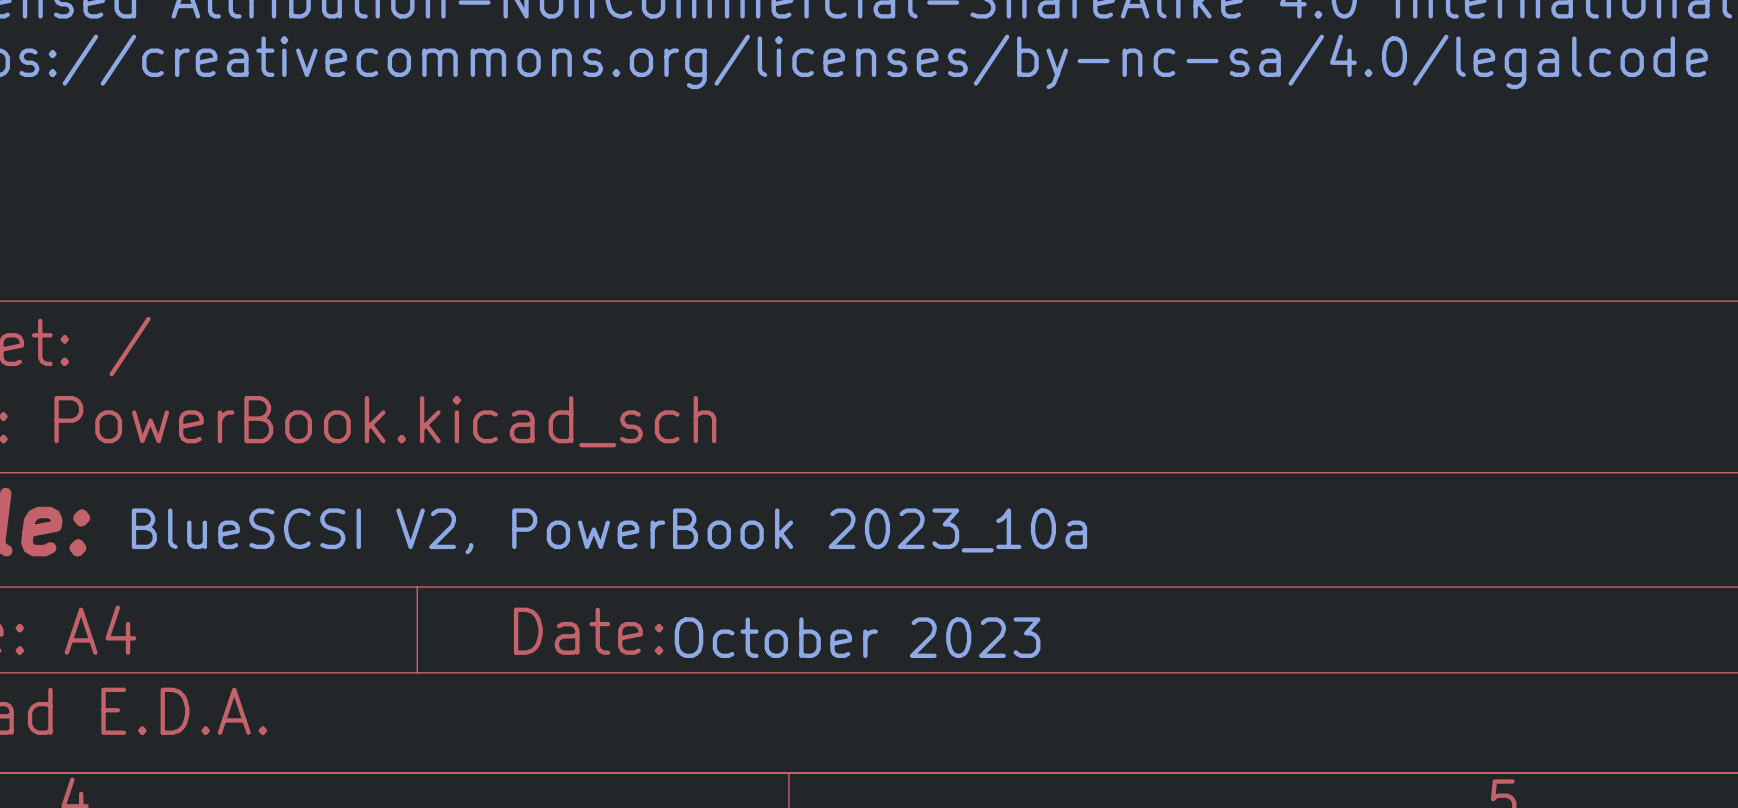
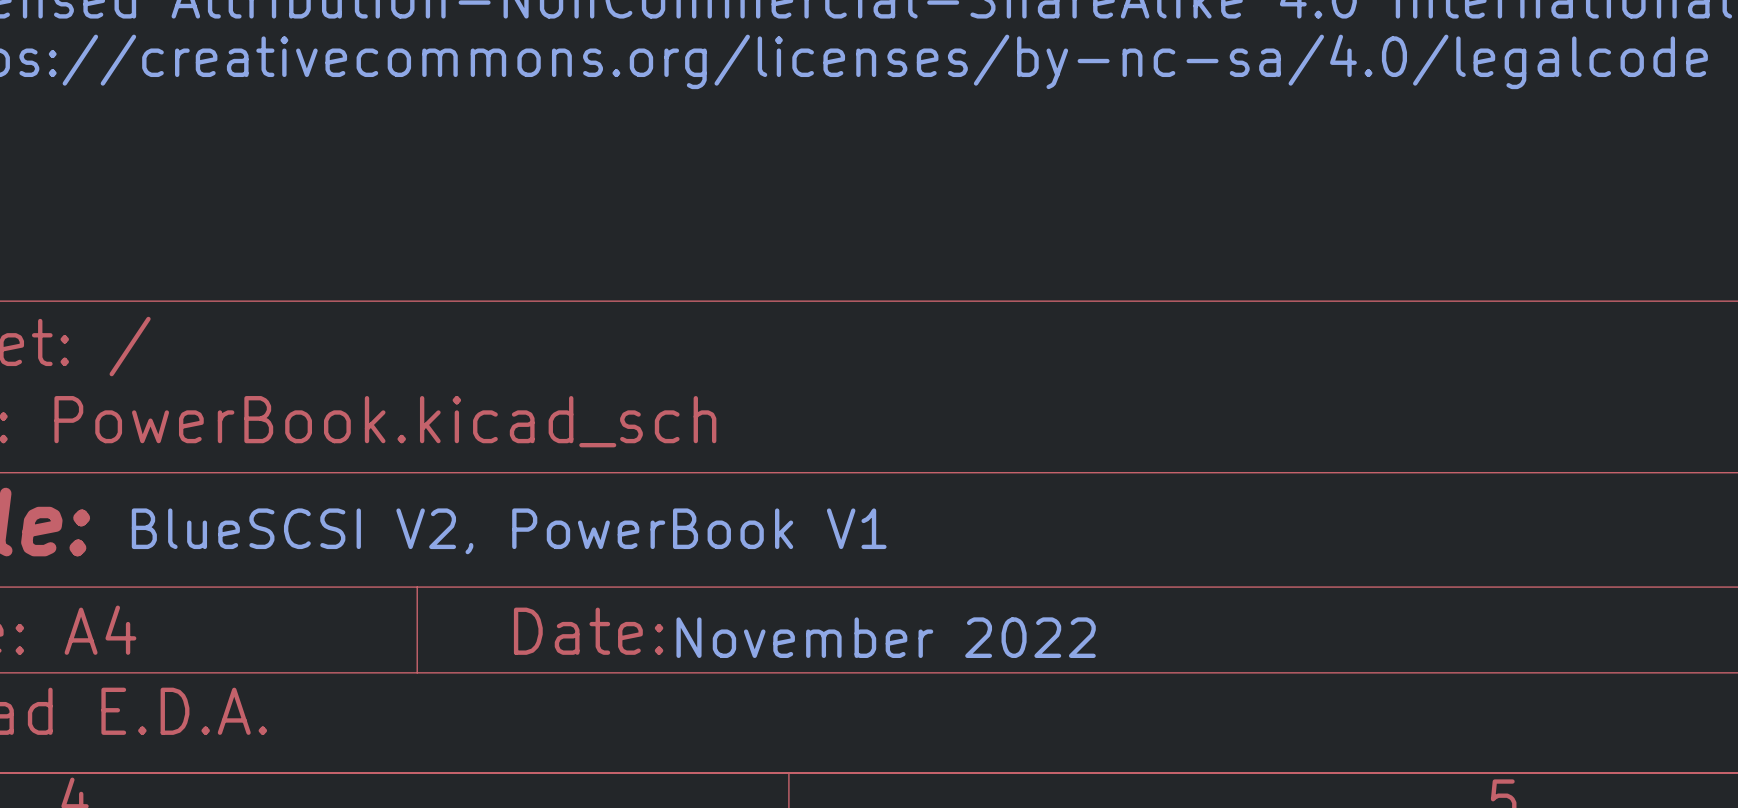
text: BlueSCSI V2, PowerBook 2023_10a (609, 531) -> BlueSCSI V2, PowerBook V1 (509, 531)
text: October 2023 (857, 637) -> November 2022 (886, 637)

